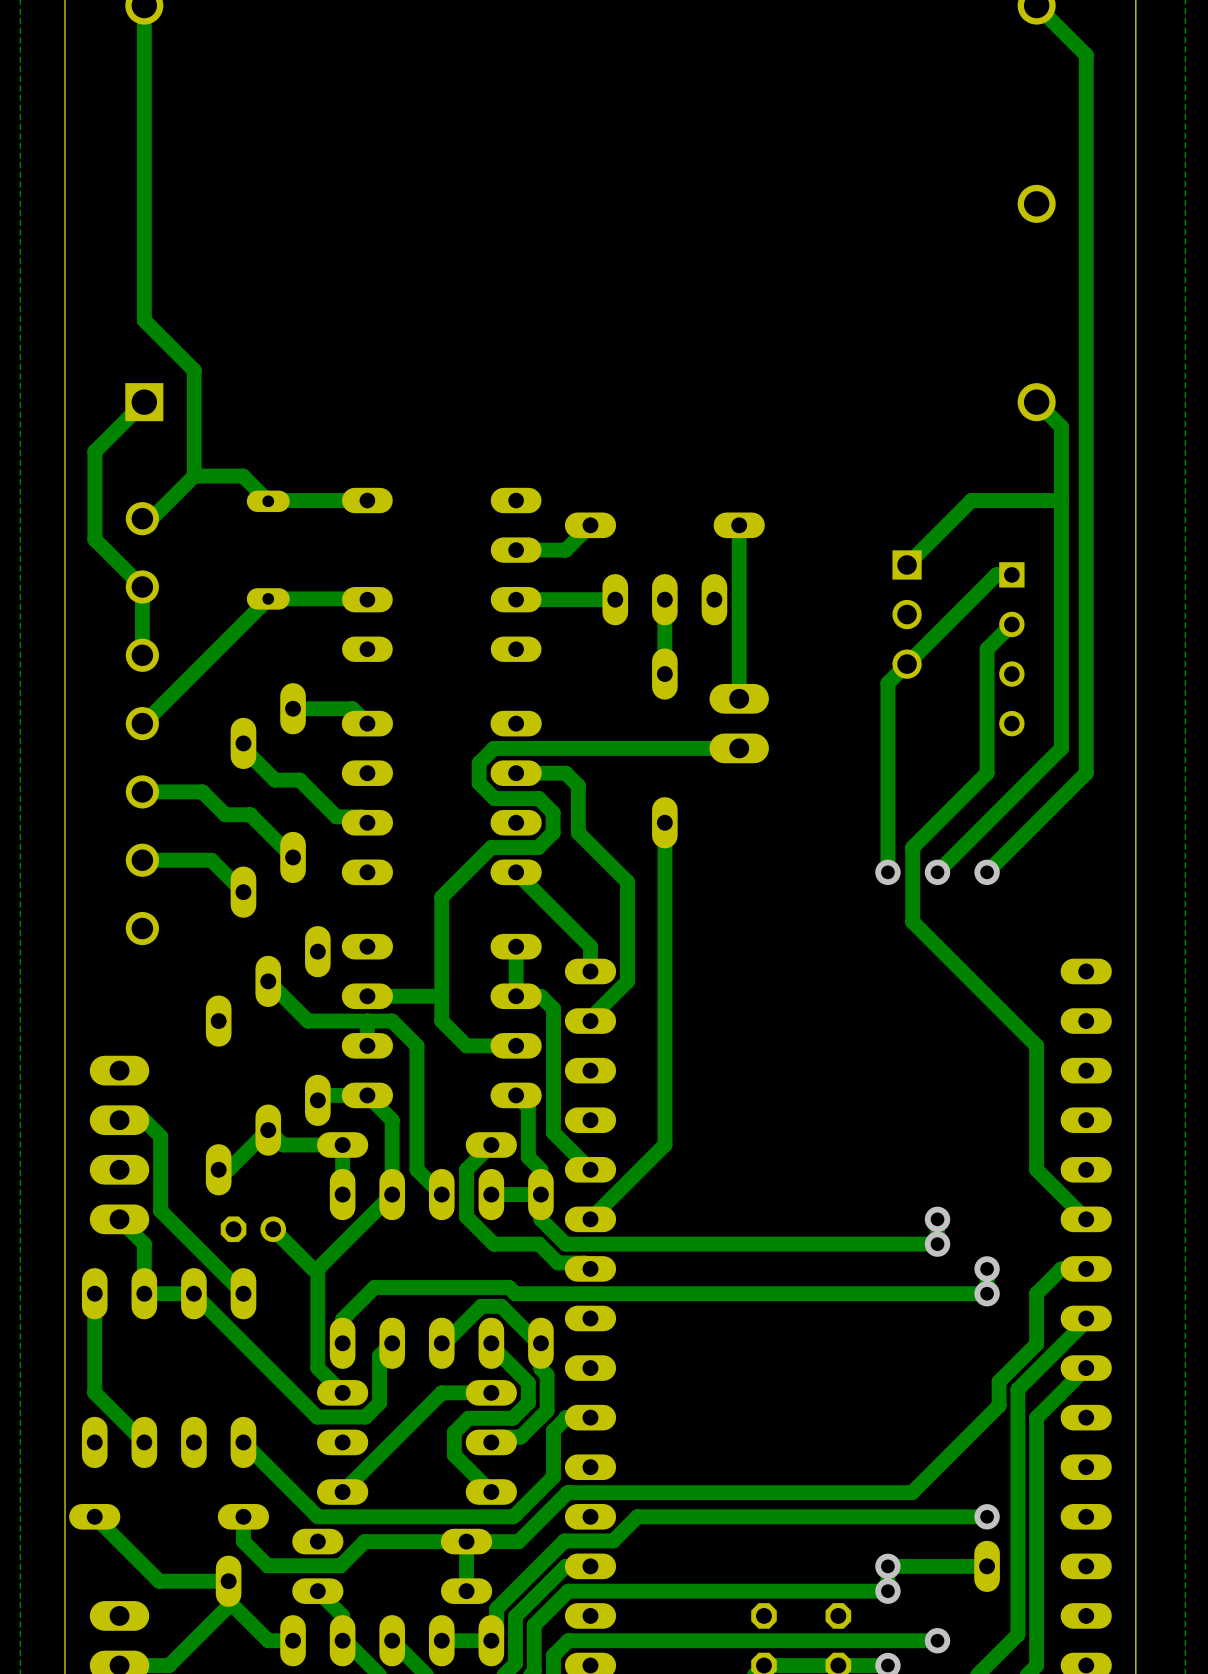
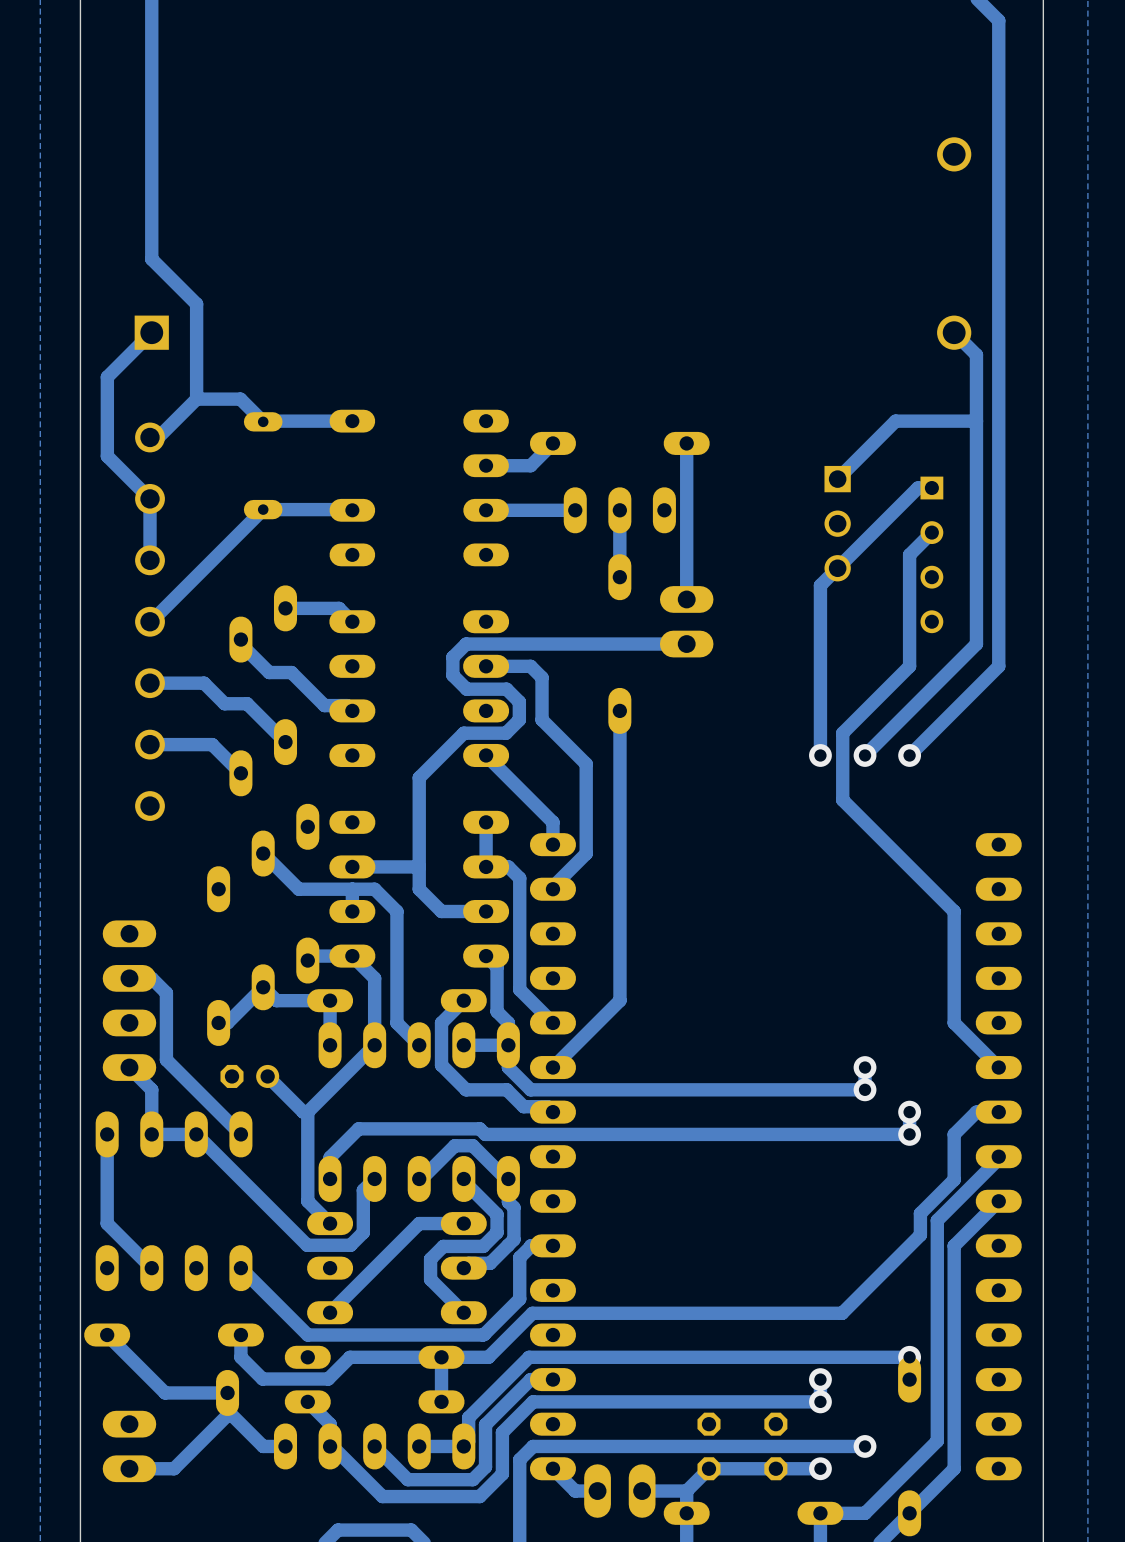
track: (987, 1516) (637, 1516) (613, 1540) (563, 1541) -> (909, 1357) (529, 1357)
via position: (987, 1516) -> (909, 1357)
track: (987, 1566) (887, 1566) -> none

